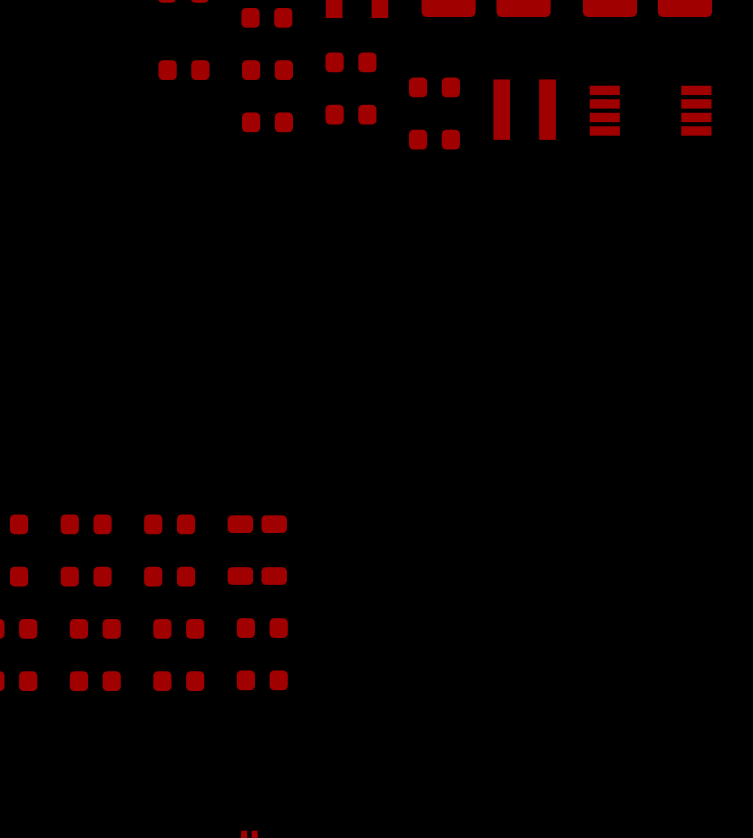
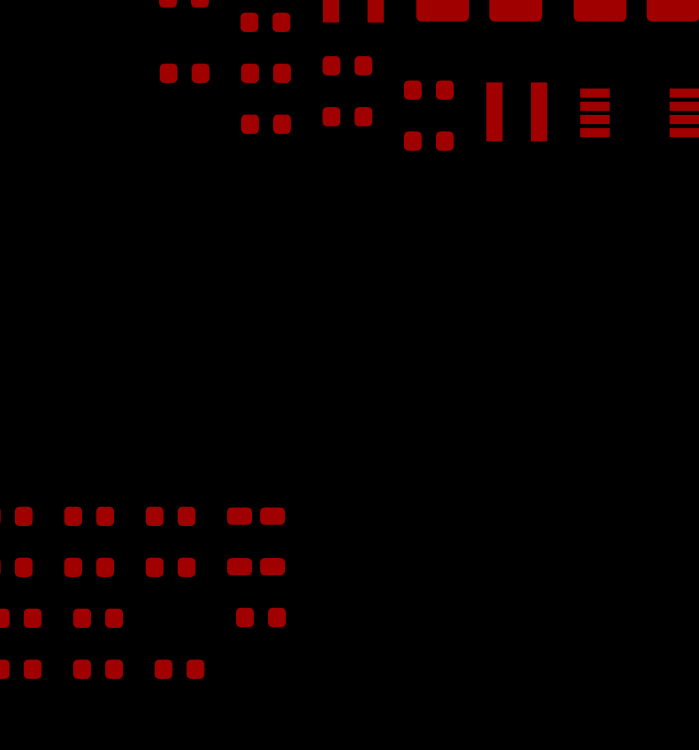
part: (178, 628) -> none
part: (262, 680) -> none

